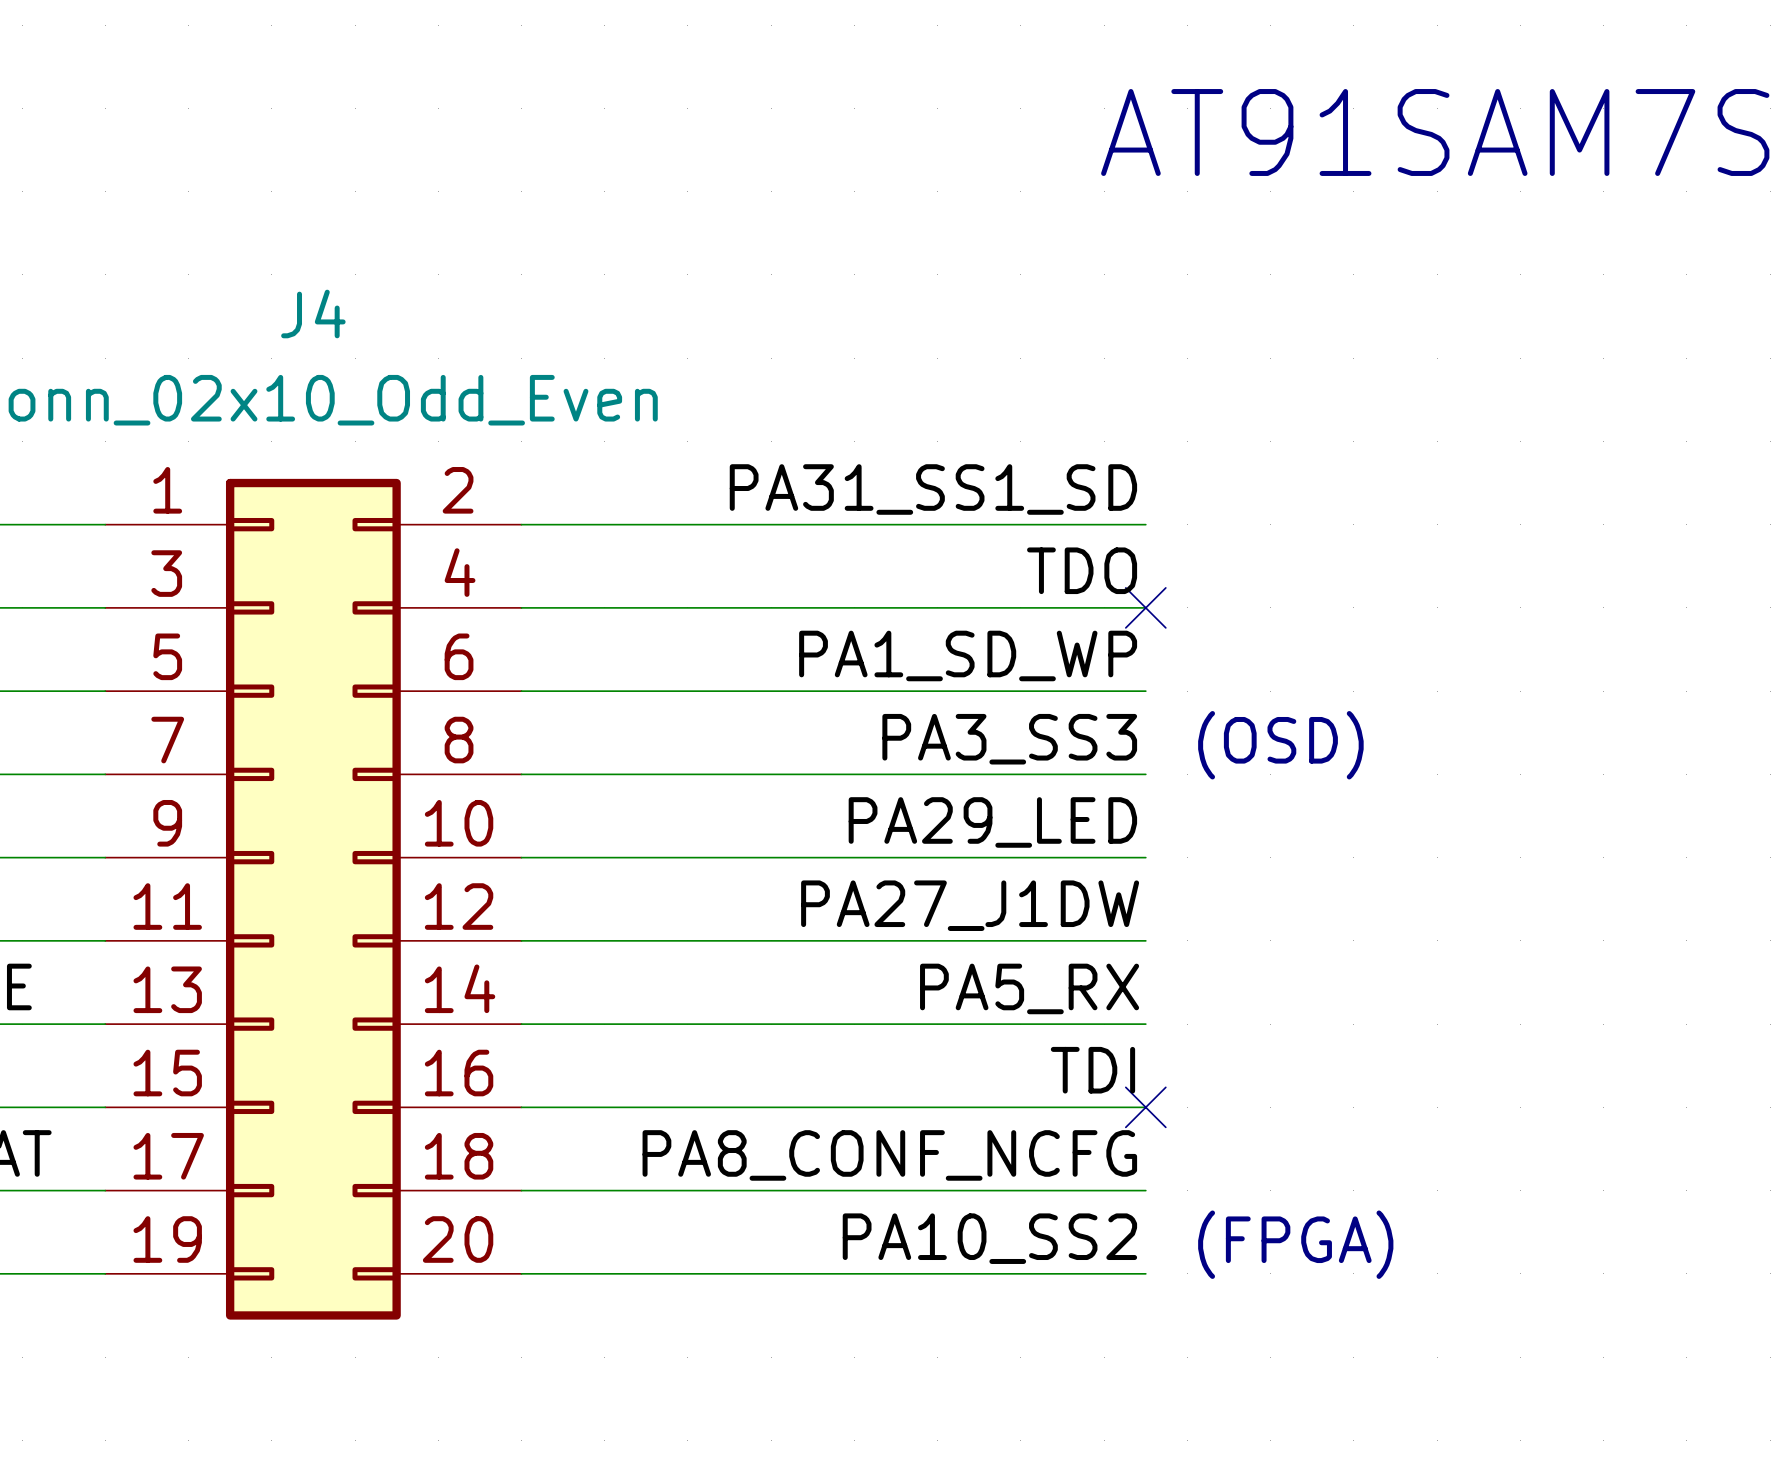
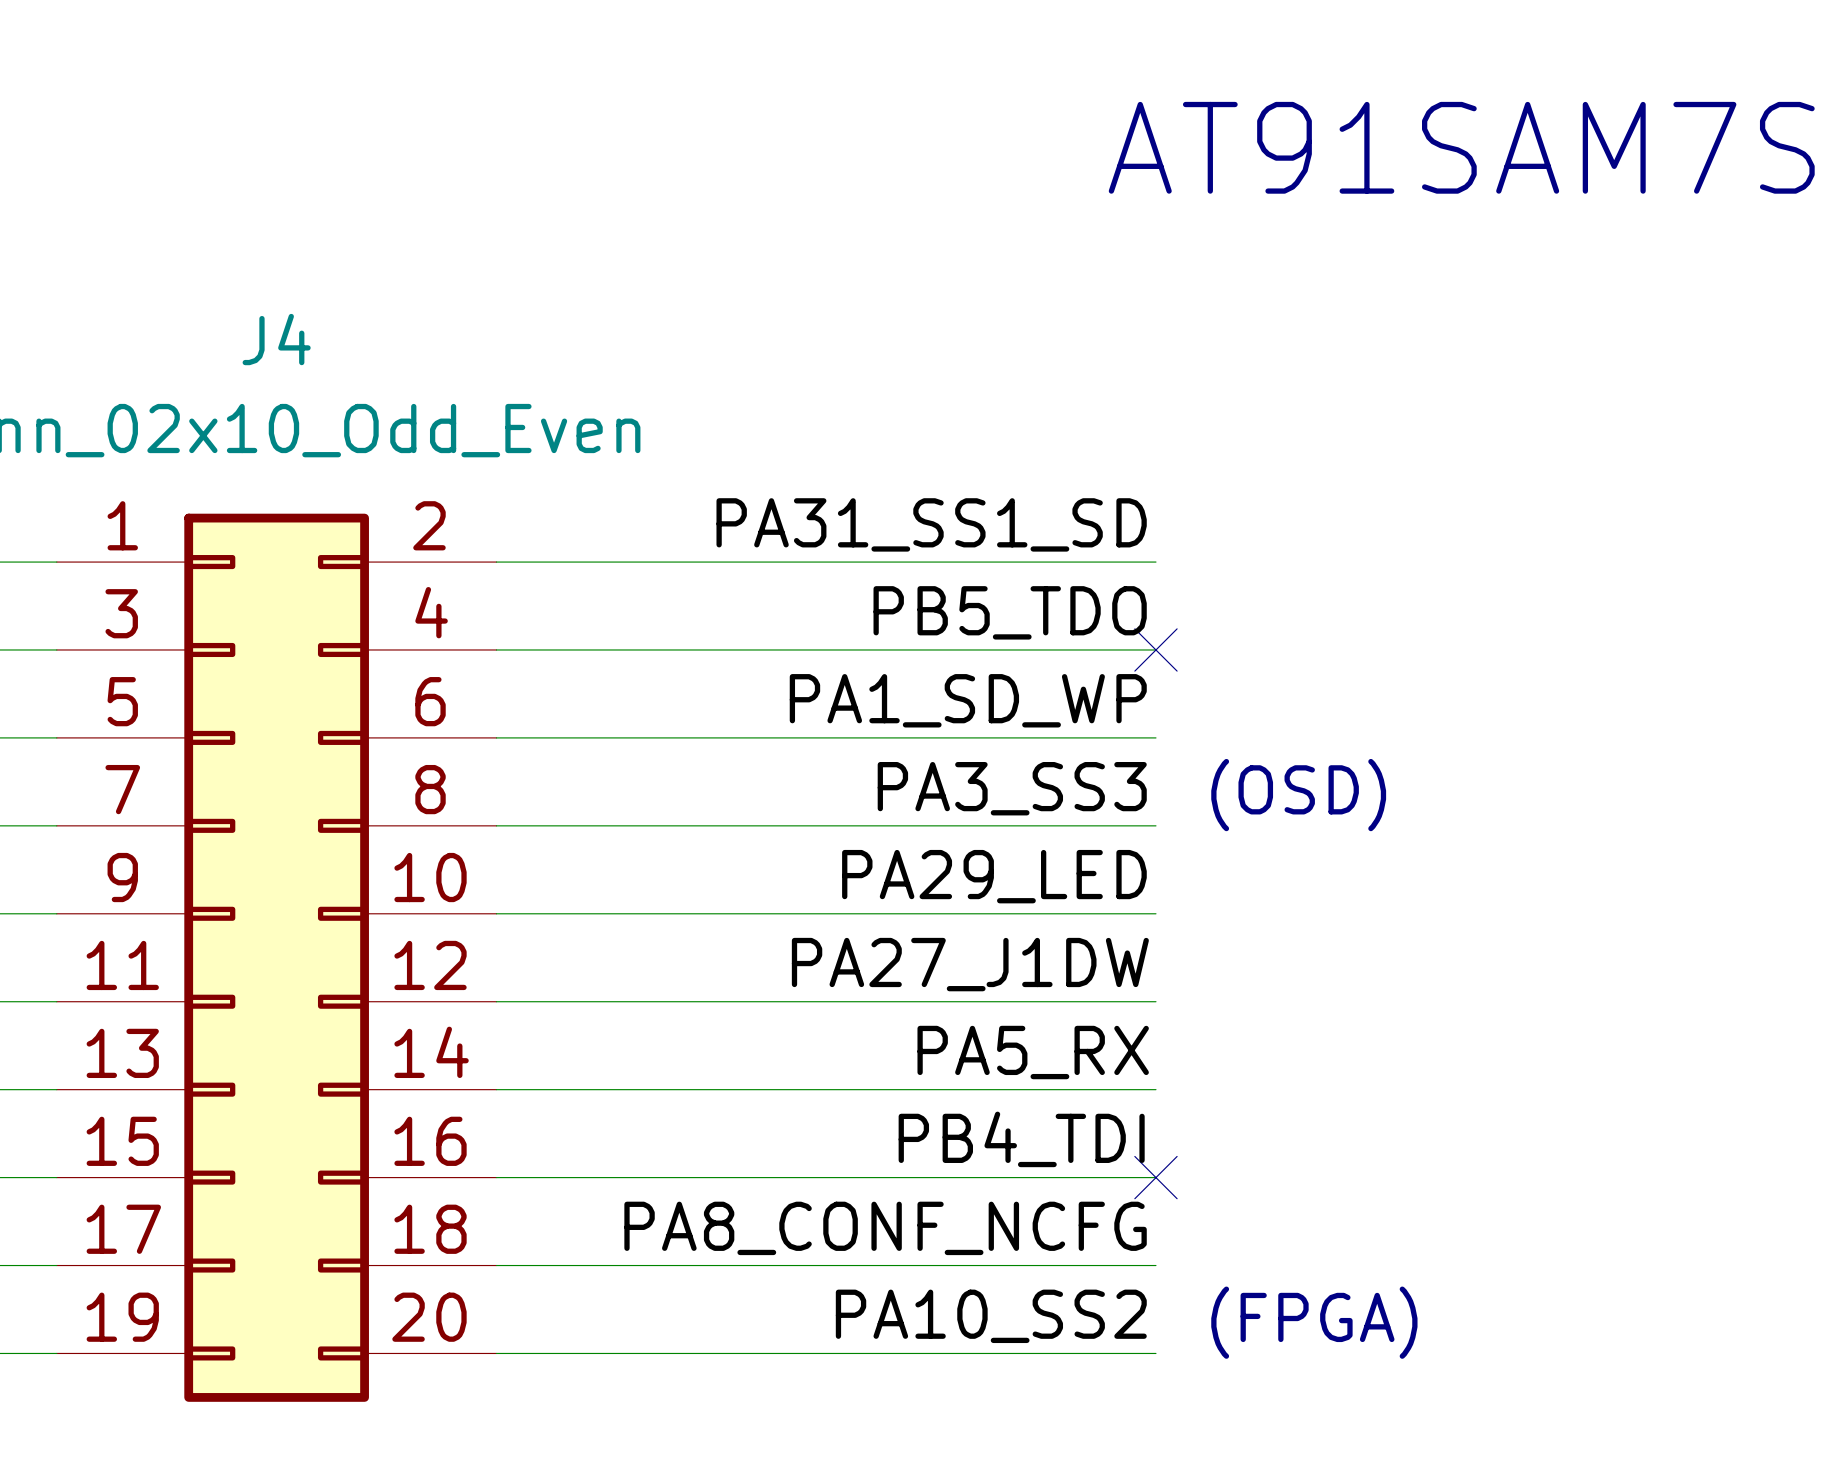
label: TDO (1082, 570) -> PB5_TDO (1010, 612)
label: TDI (1092, 1070) -> PB4_TDI (1021, 1139)

